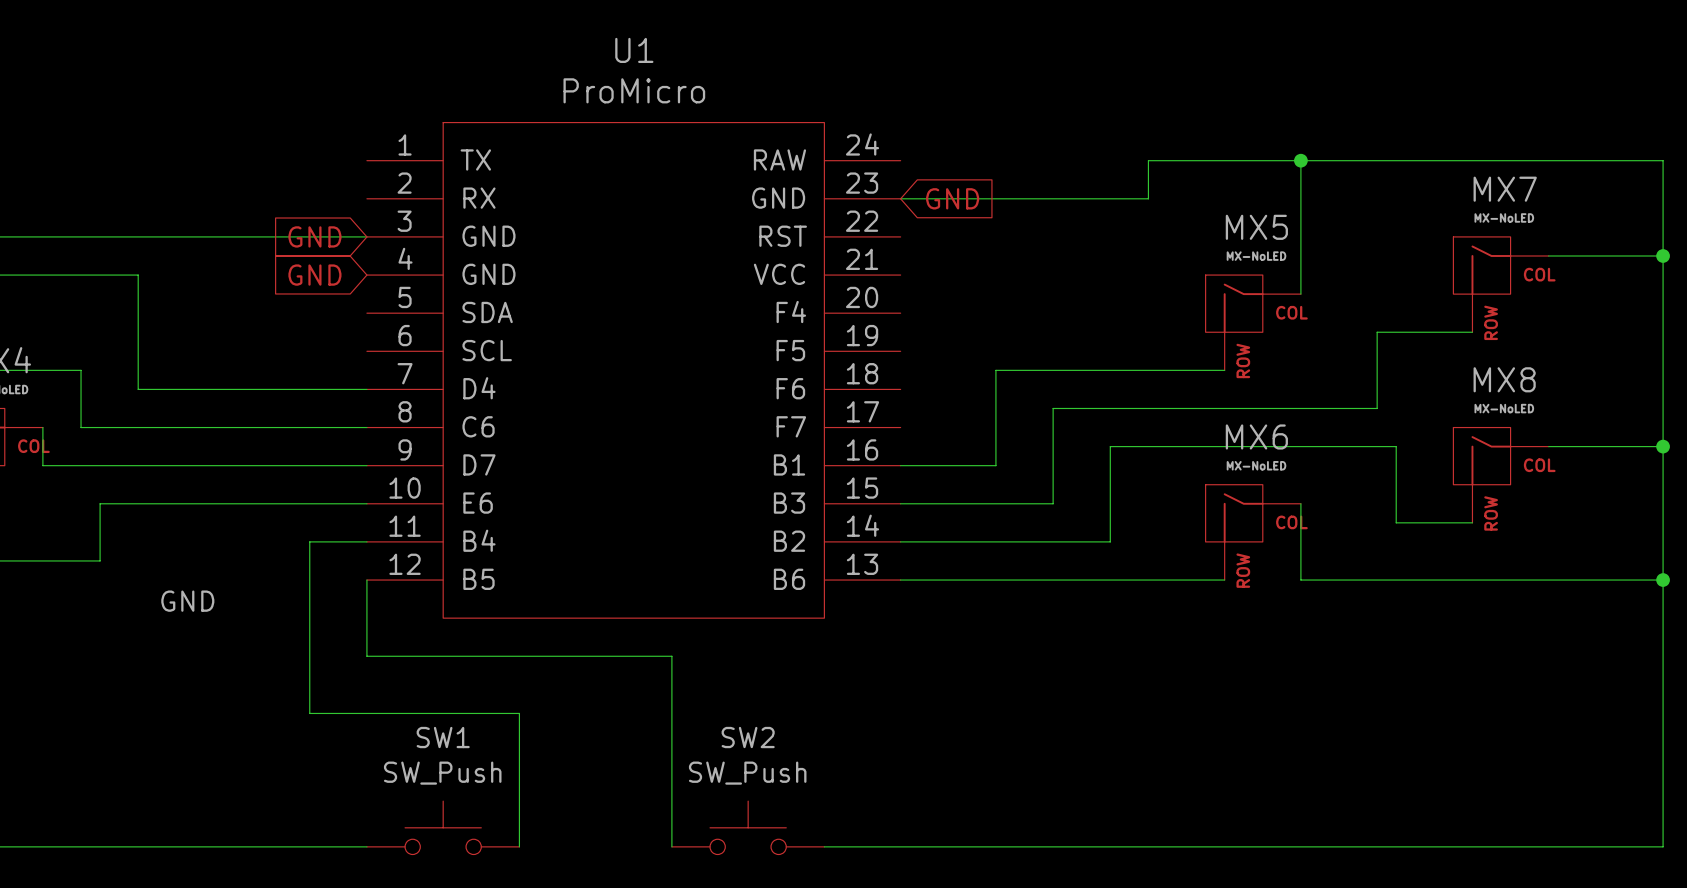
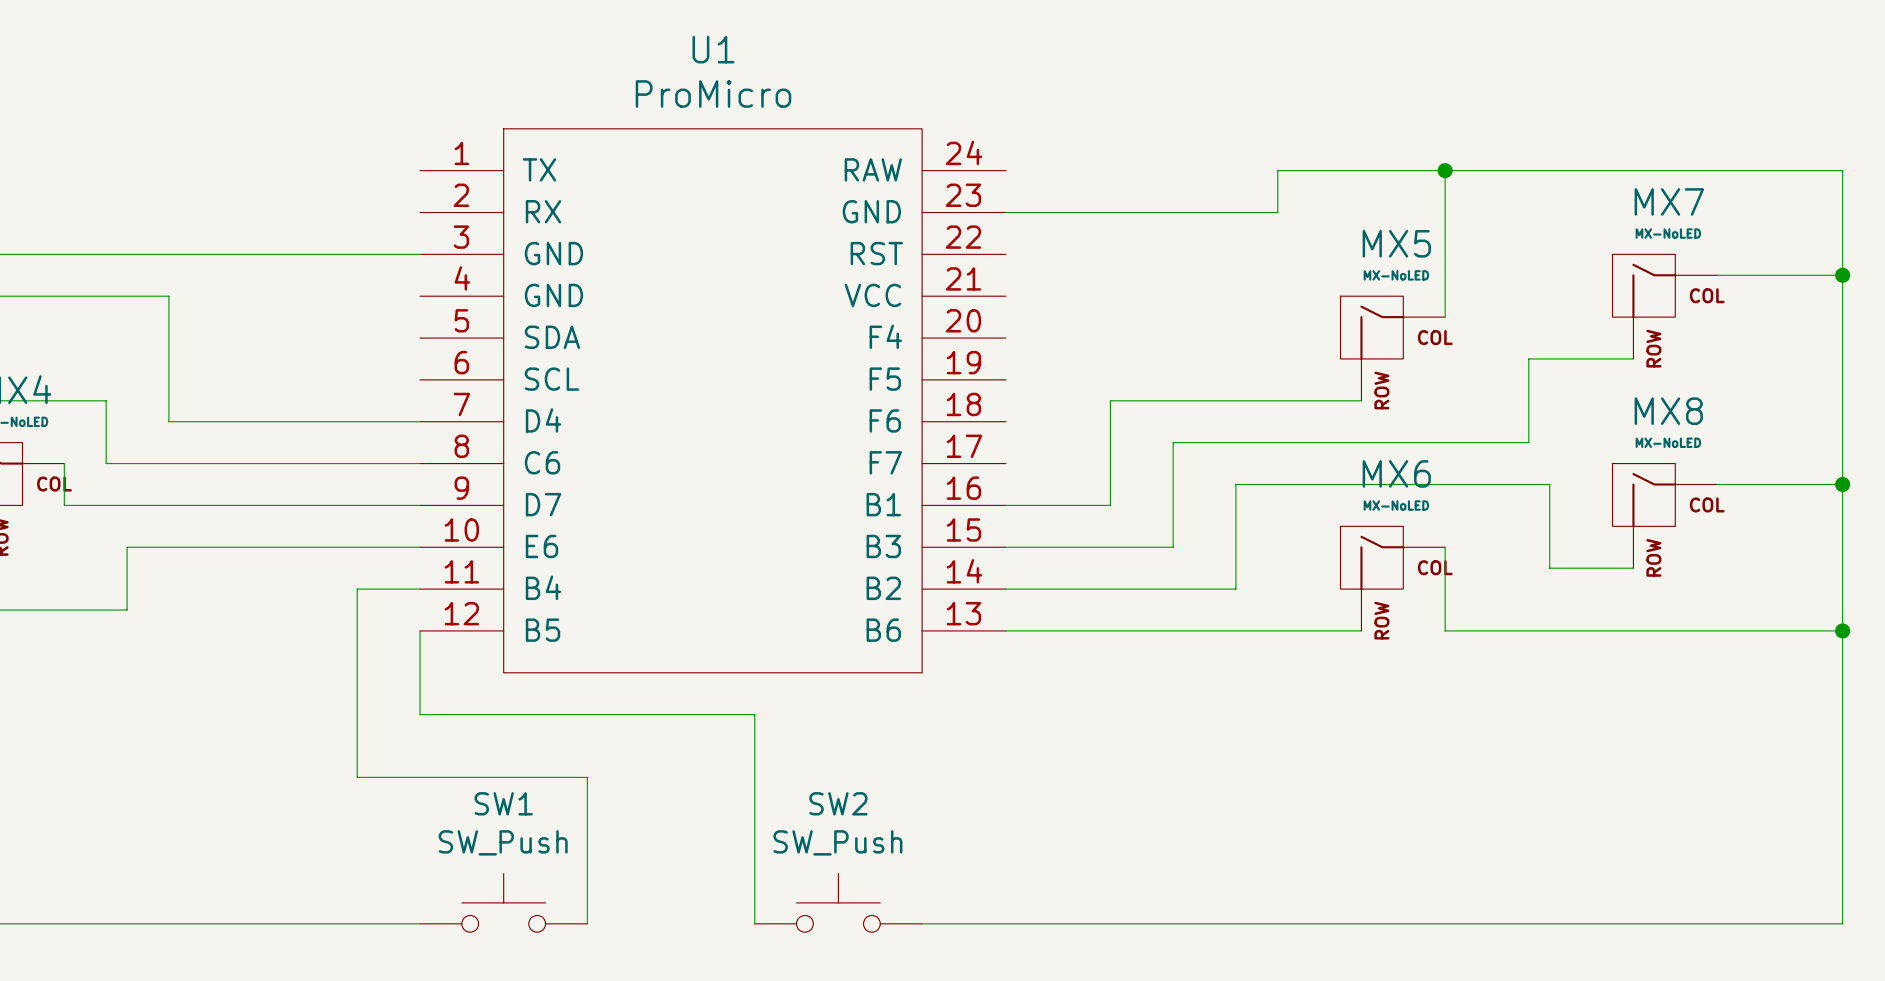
global label: GND (952, 198) -> none
global label: GND (314, 236) -> none
global label: GND (314, 275) -> none
label: GND (187, 601) -> none

